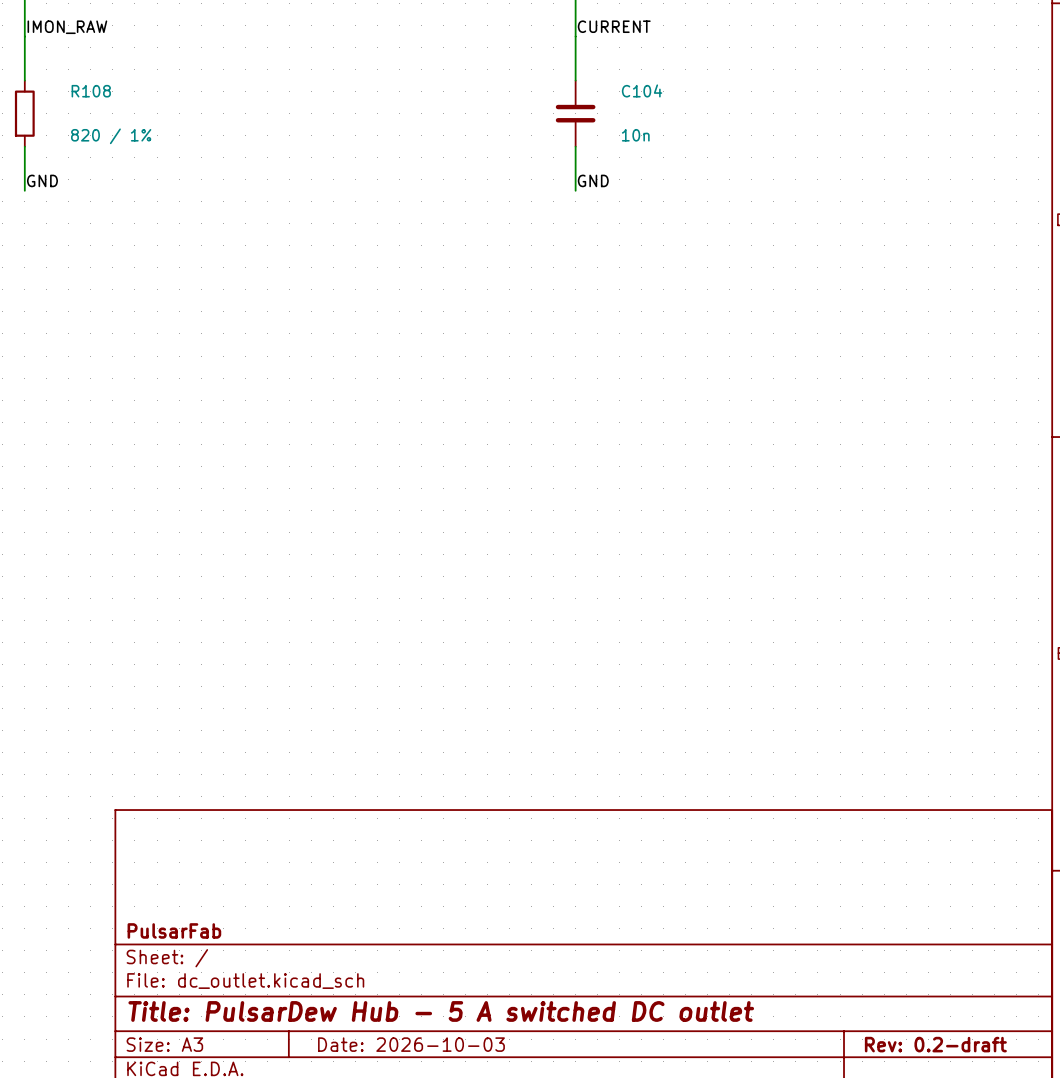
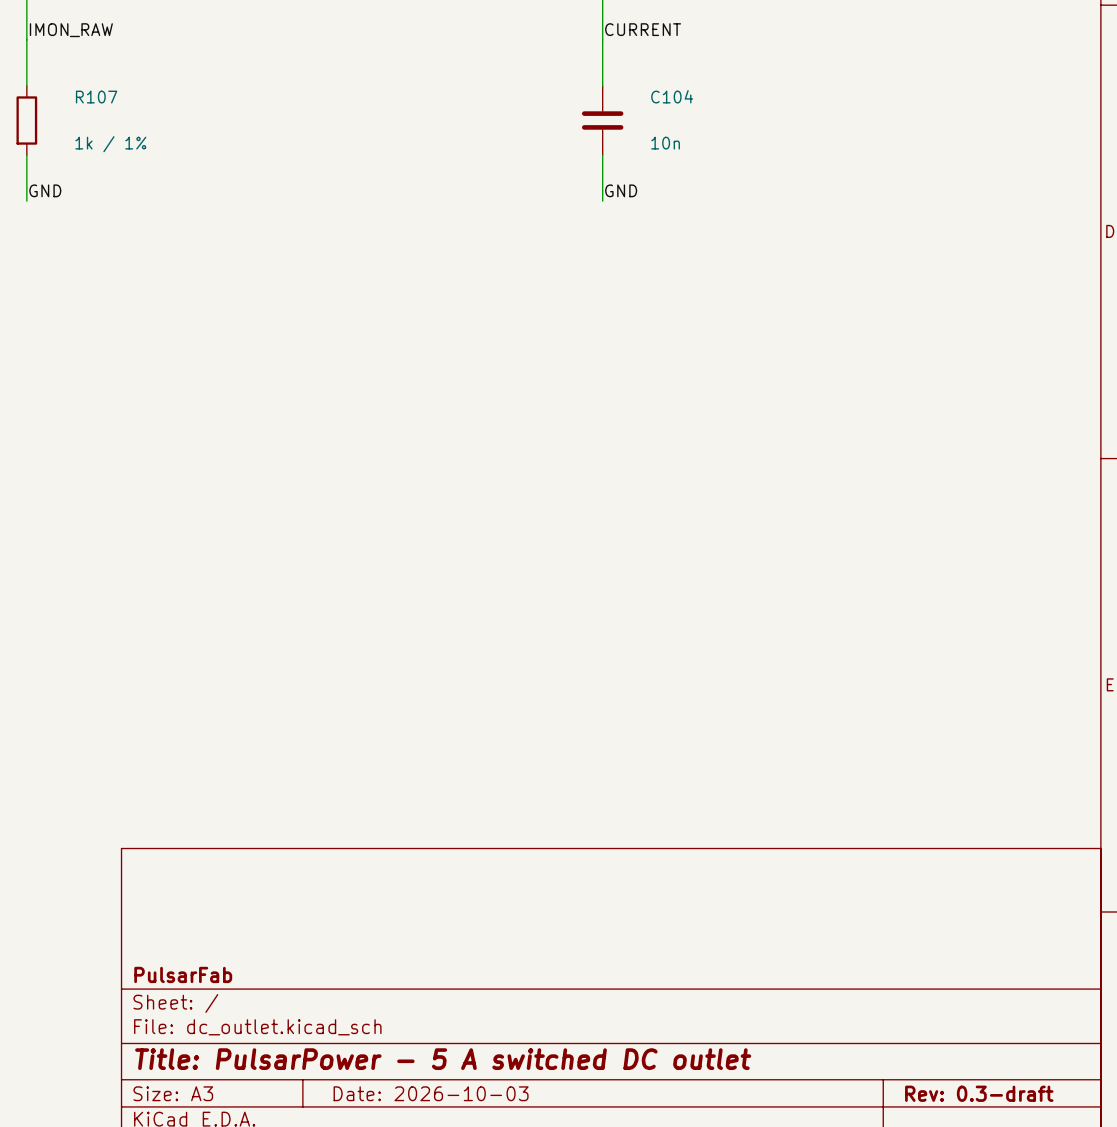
R108 name: R108 (91, 91) -> R107 (96, 97)
R108 value: 820 / 1% (111, 136) -> 1k / 1% (110, 144)
title block: Title: PulsarDew Hub - 5 A switched DC outlet (441, 1011) -> Title: PulsarPower - 5 A switched DC outlet (443, 1059)
title block: Rev: 0.2-draft (935, 1044) -> Rev: 0.3-draft (979, 1093)

